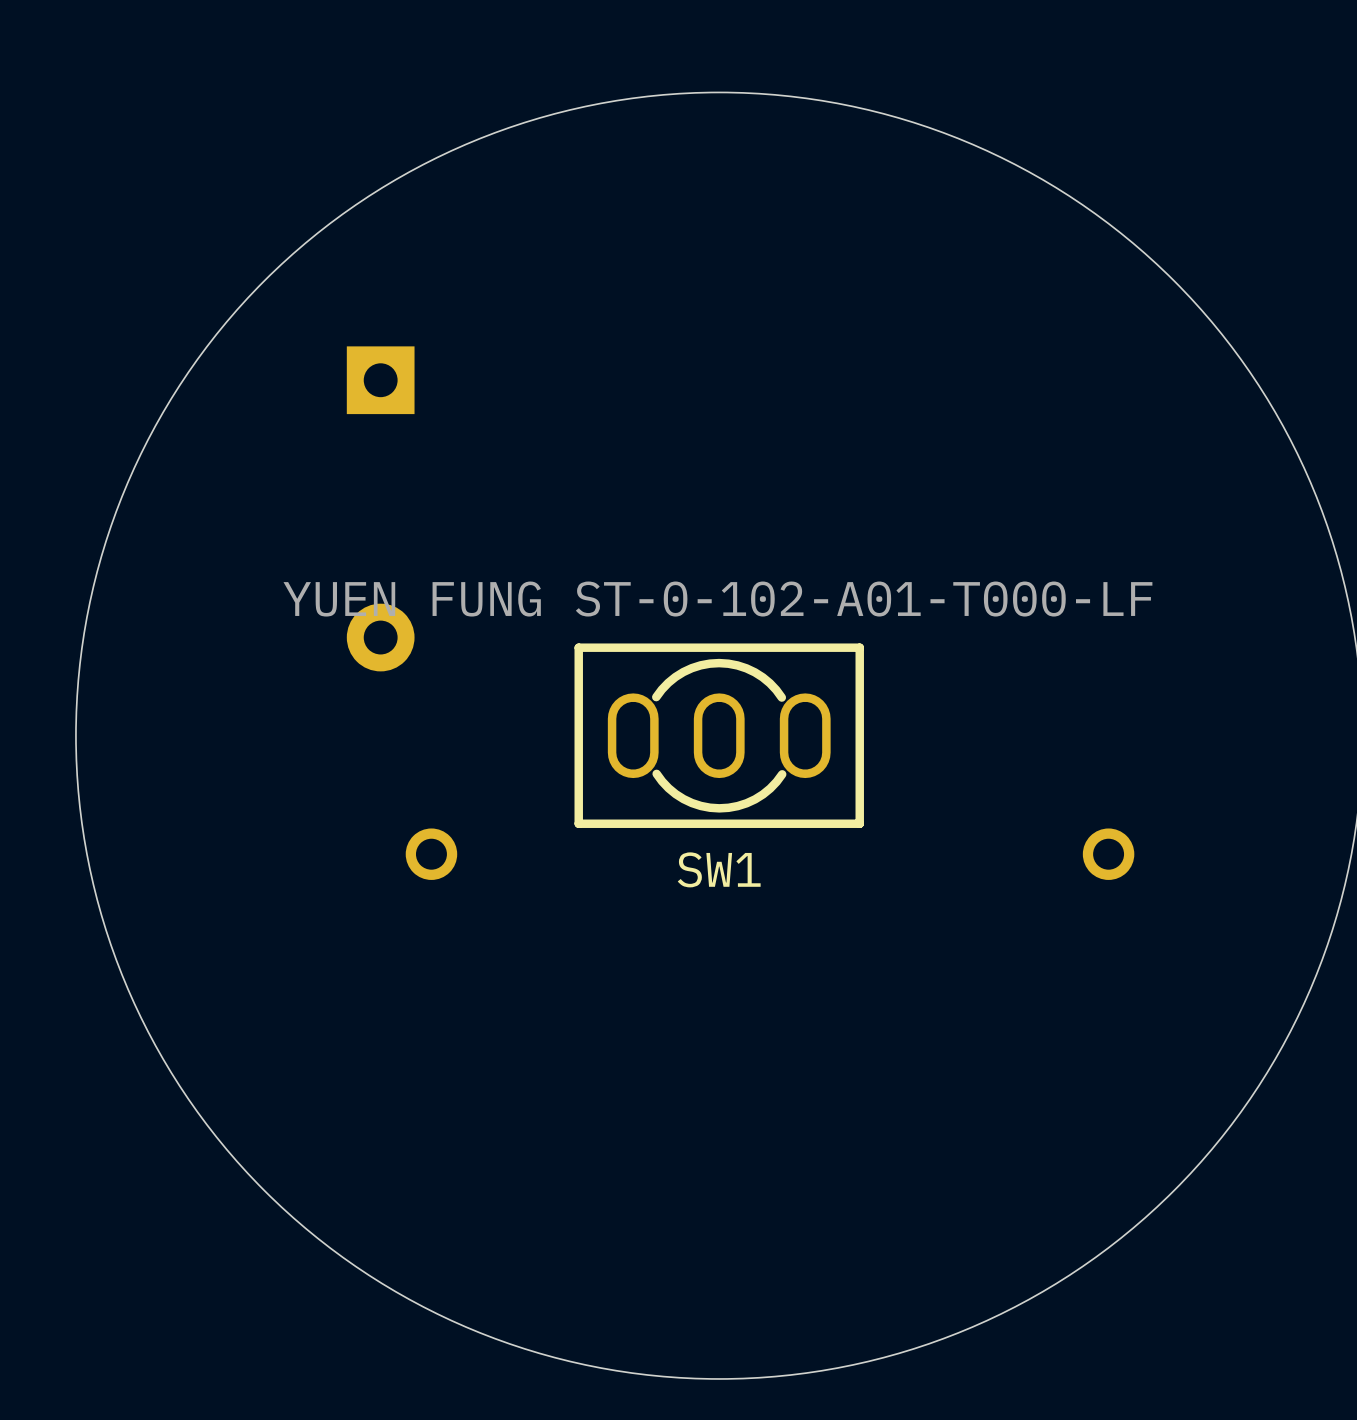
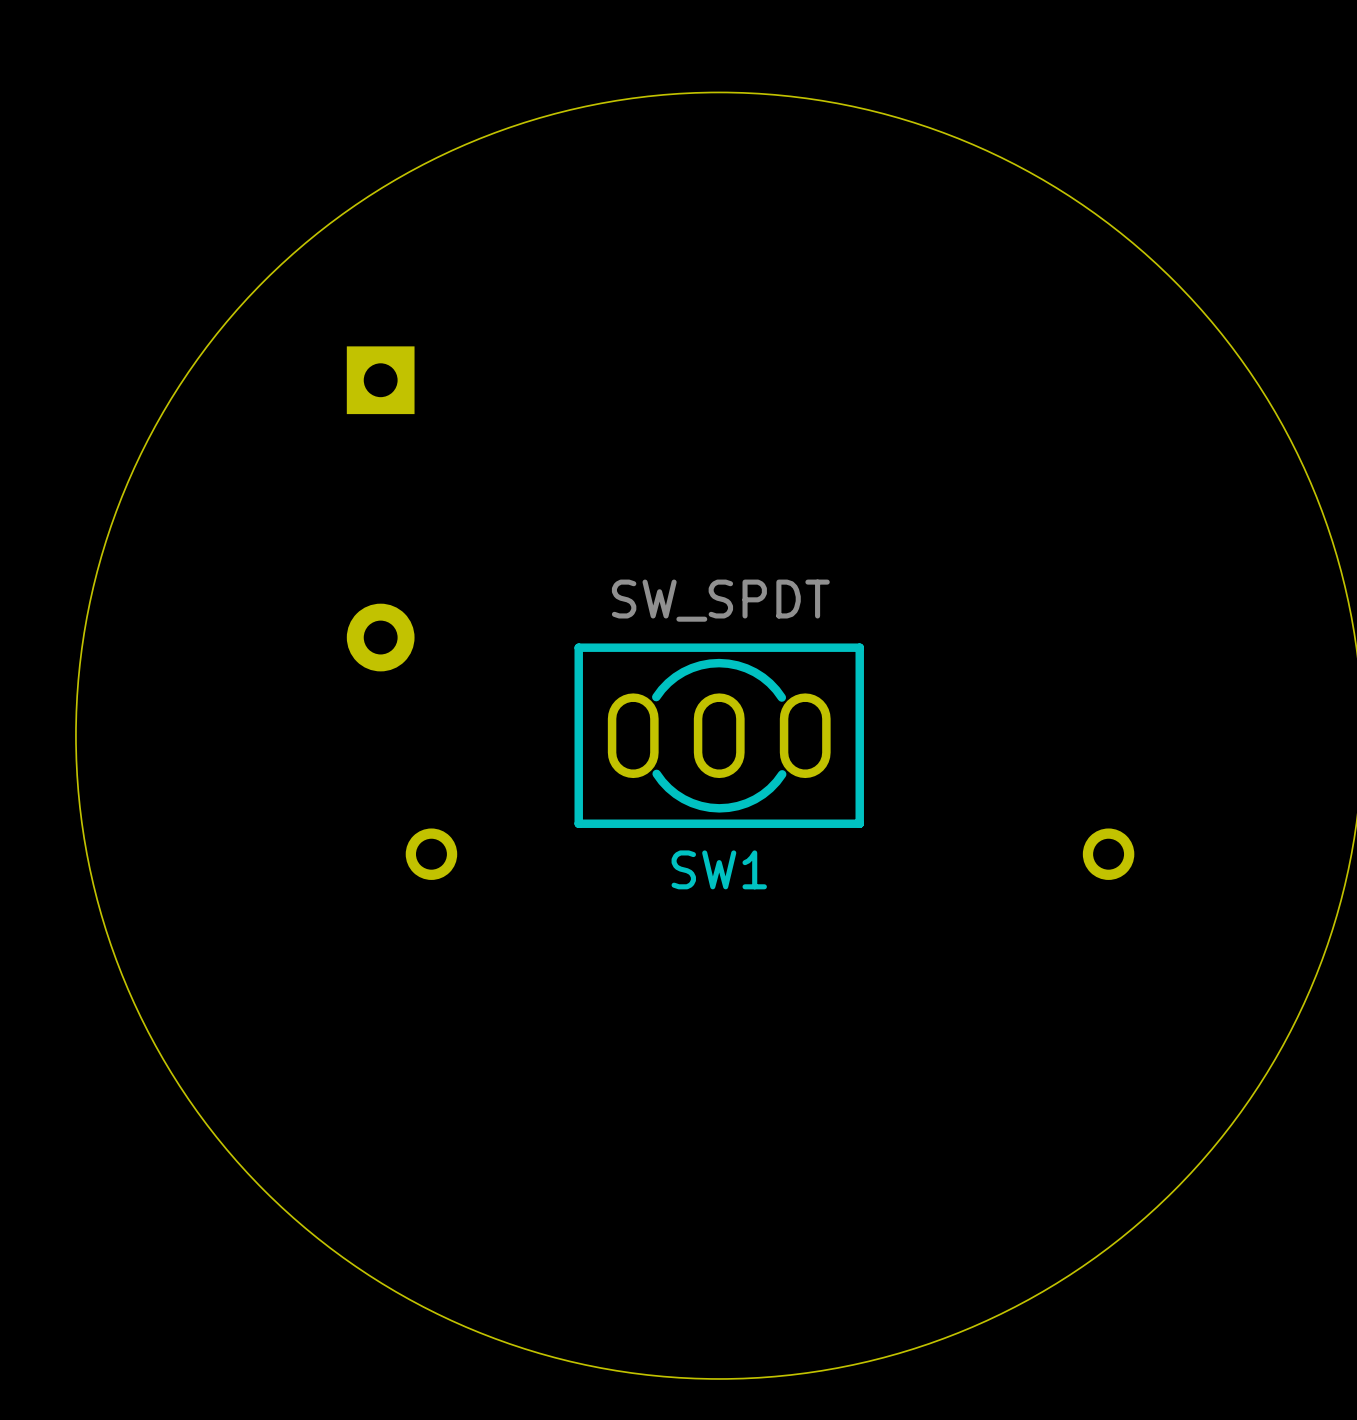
SW1 value: YUEN FUNG ST-0-102-A01-T000-LF (717, 599) -> SW_SPDT (720, 600)

